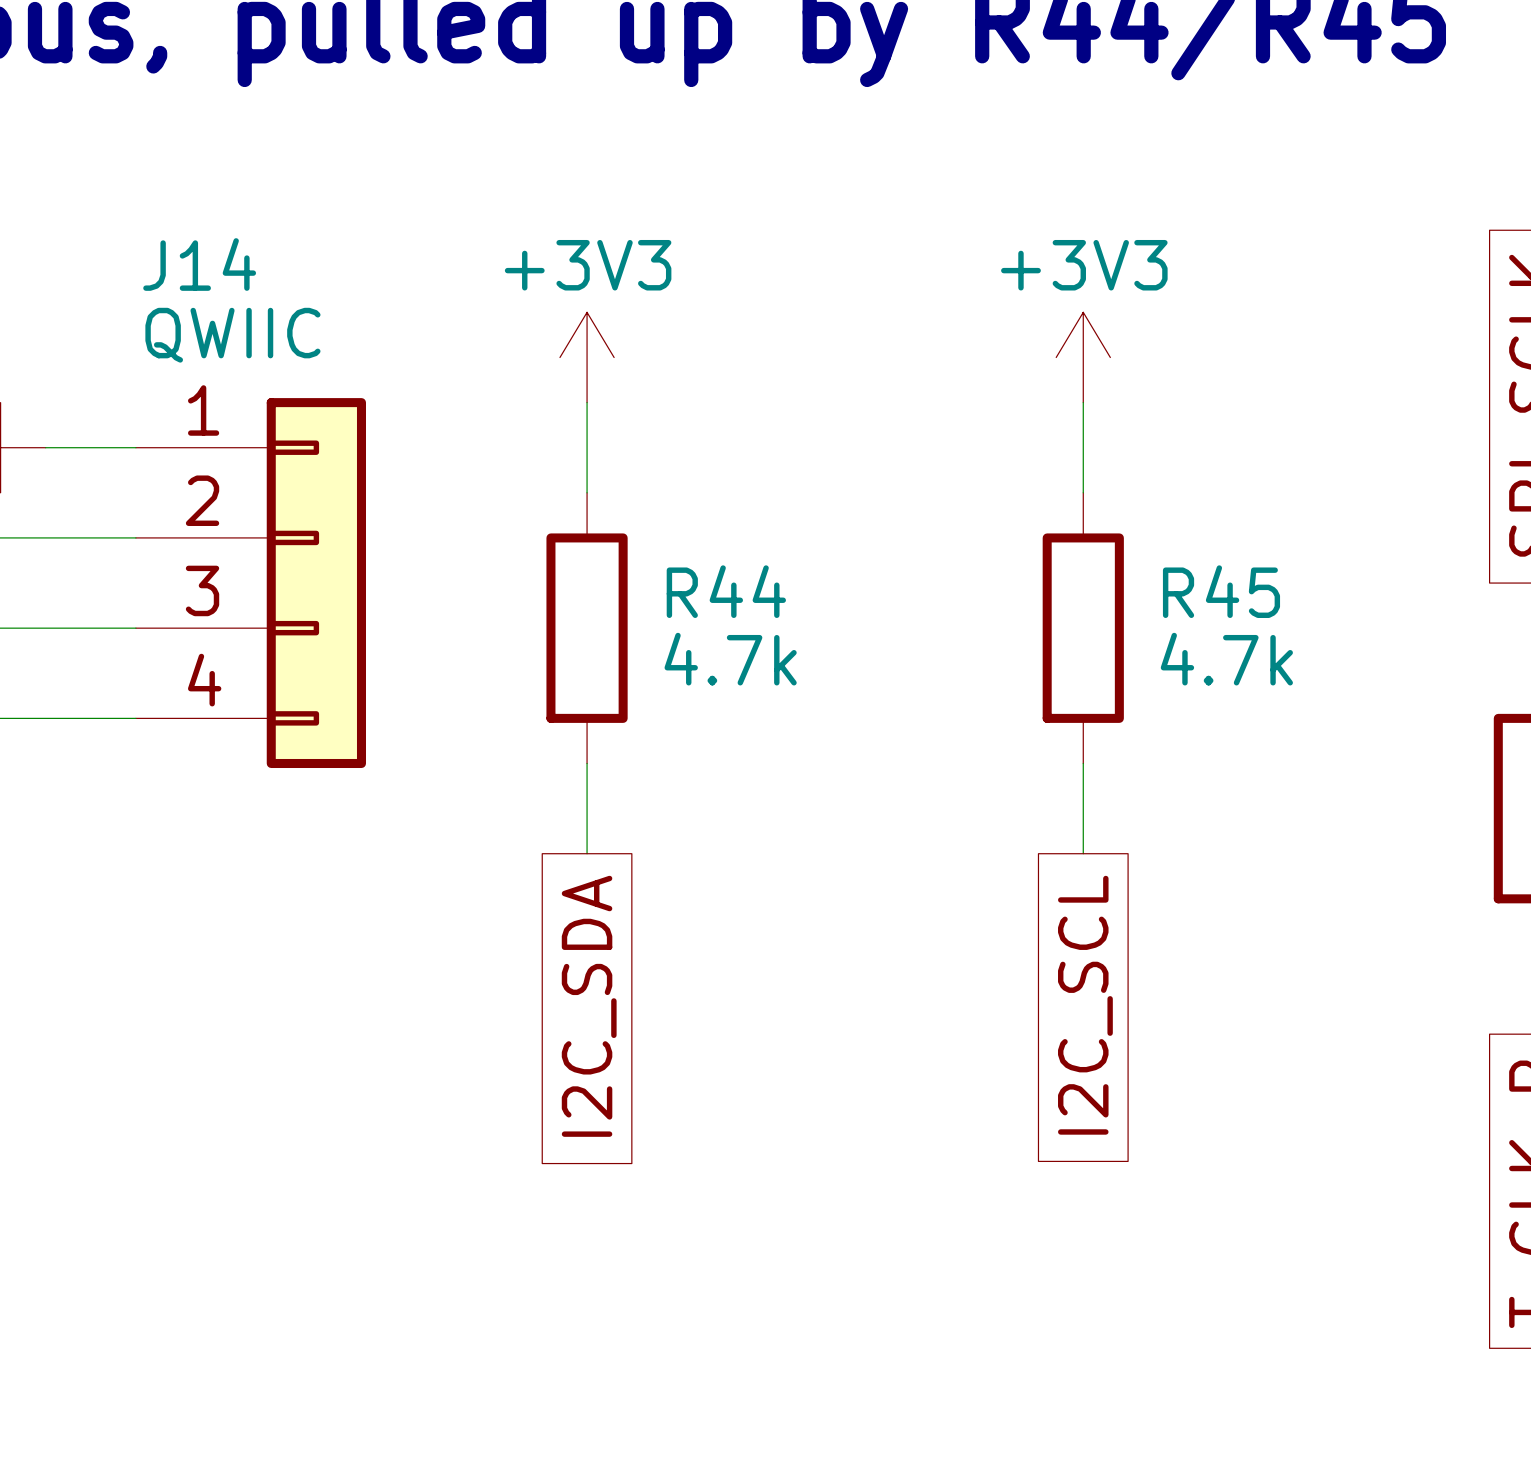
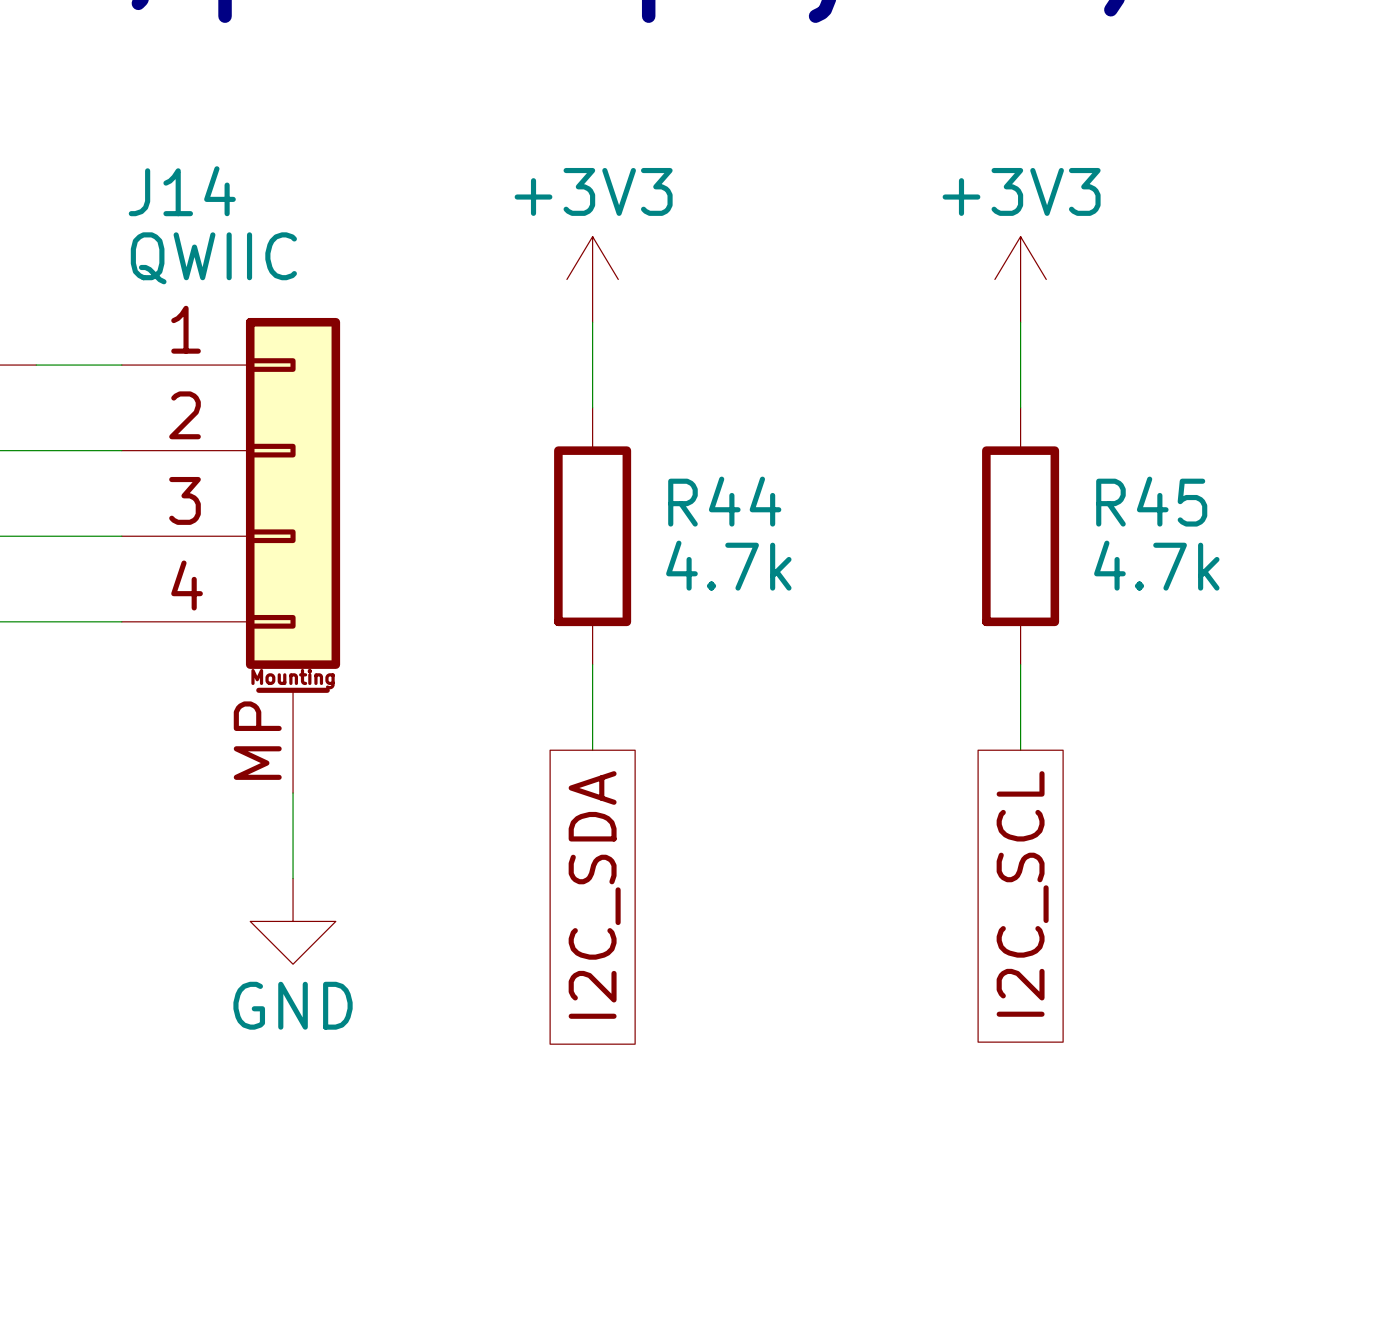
power symbol position: +3V3 (587, 357) -> +3V3 (592, 279)
J14 symbol: [135, 398, 367, 769] -> [121, 317, 341, 794]
wire: (587, 402) (587, 492) -> (592, 322) (592, 407)
R44 position: (587, 628) -> (592, 536)
wire: (587, 763) (587, 853) -> (592, 664) (592, 750)
wire: none -> (293, 793) (293, 878)
global label position: I2C_SDA (589, 1006) -> I2C_SDA (594, 894)
power symbol: none -> GND (293, 921)

